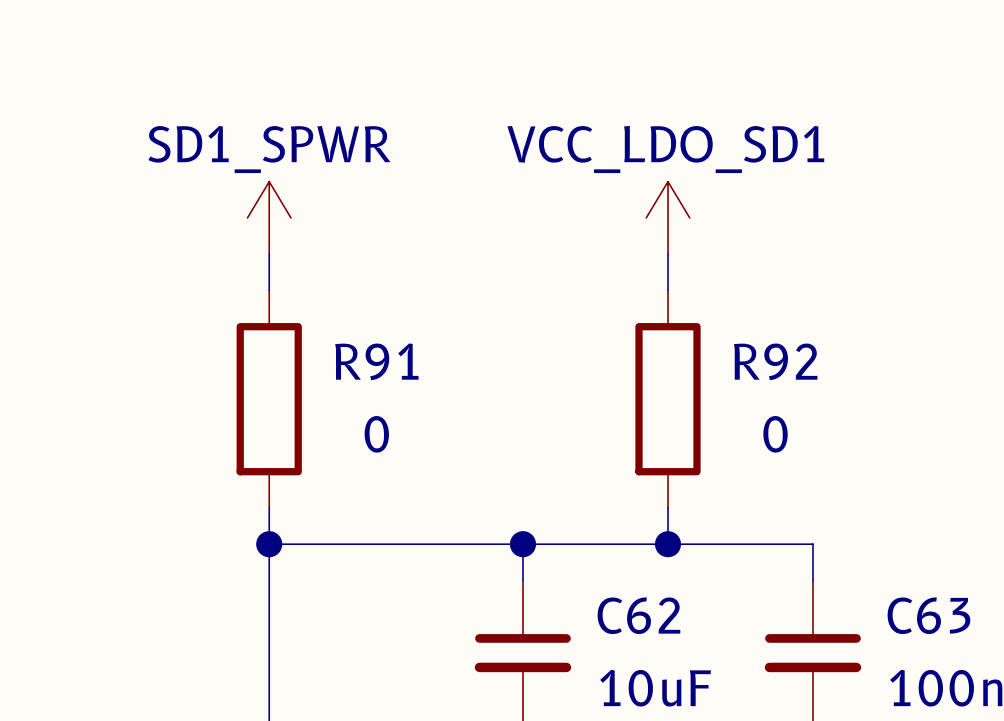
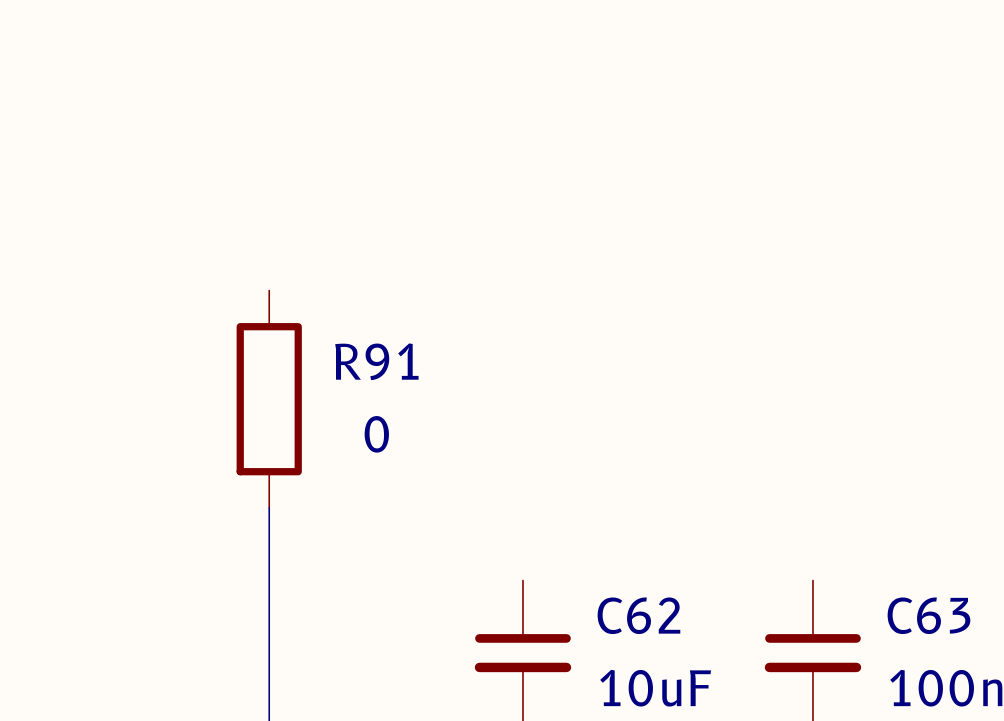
power symbol: SD1_SPWR (269, 217) -> none
power symbol: VCC_LDO_SD1 (667, 217) -> none
wire: (269, 254) (269, 290) -> none
wire: (667, 254) (667, 290) -> none
R92: 0 (667, 399) -> none
wire: (667, 507) (667, 544) -> none
wire: (269, 544) (812, 544) (812, 580) -> none
junction: (269, 544) -> none
wire: (522, 544) (522, 580) -> none
junction: (522, 544) -> none
junction: (667, 544) -> none

